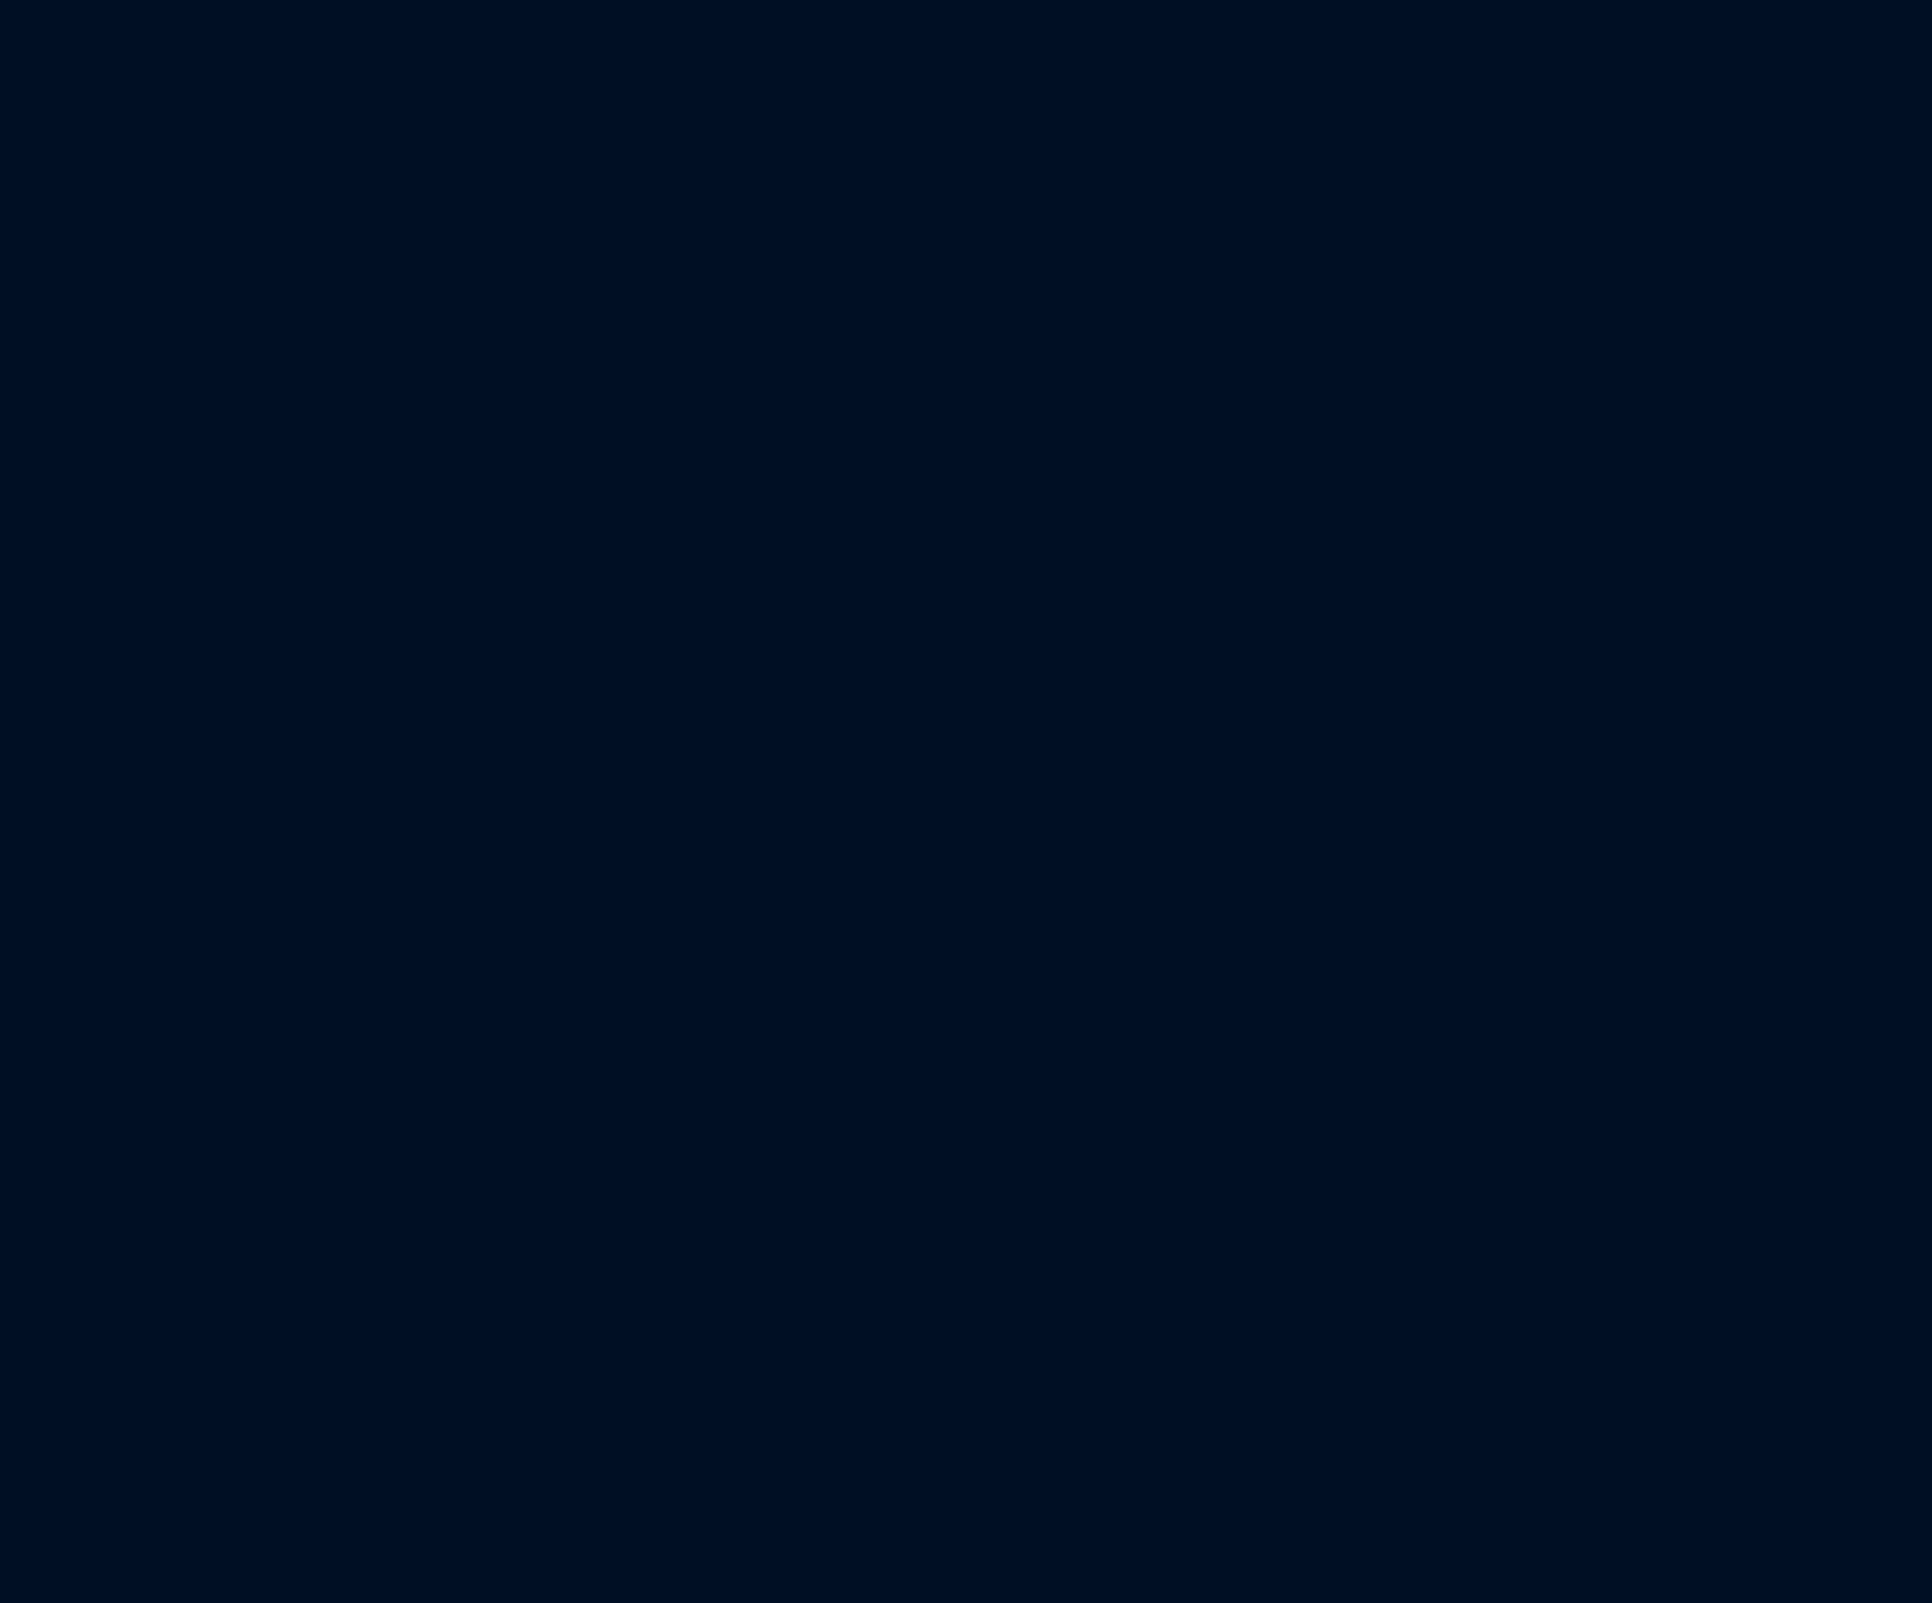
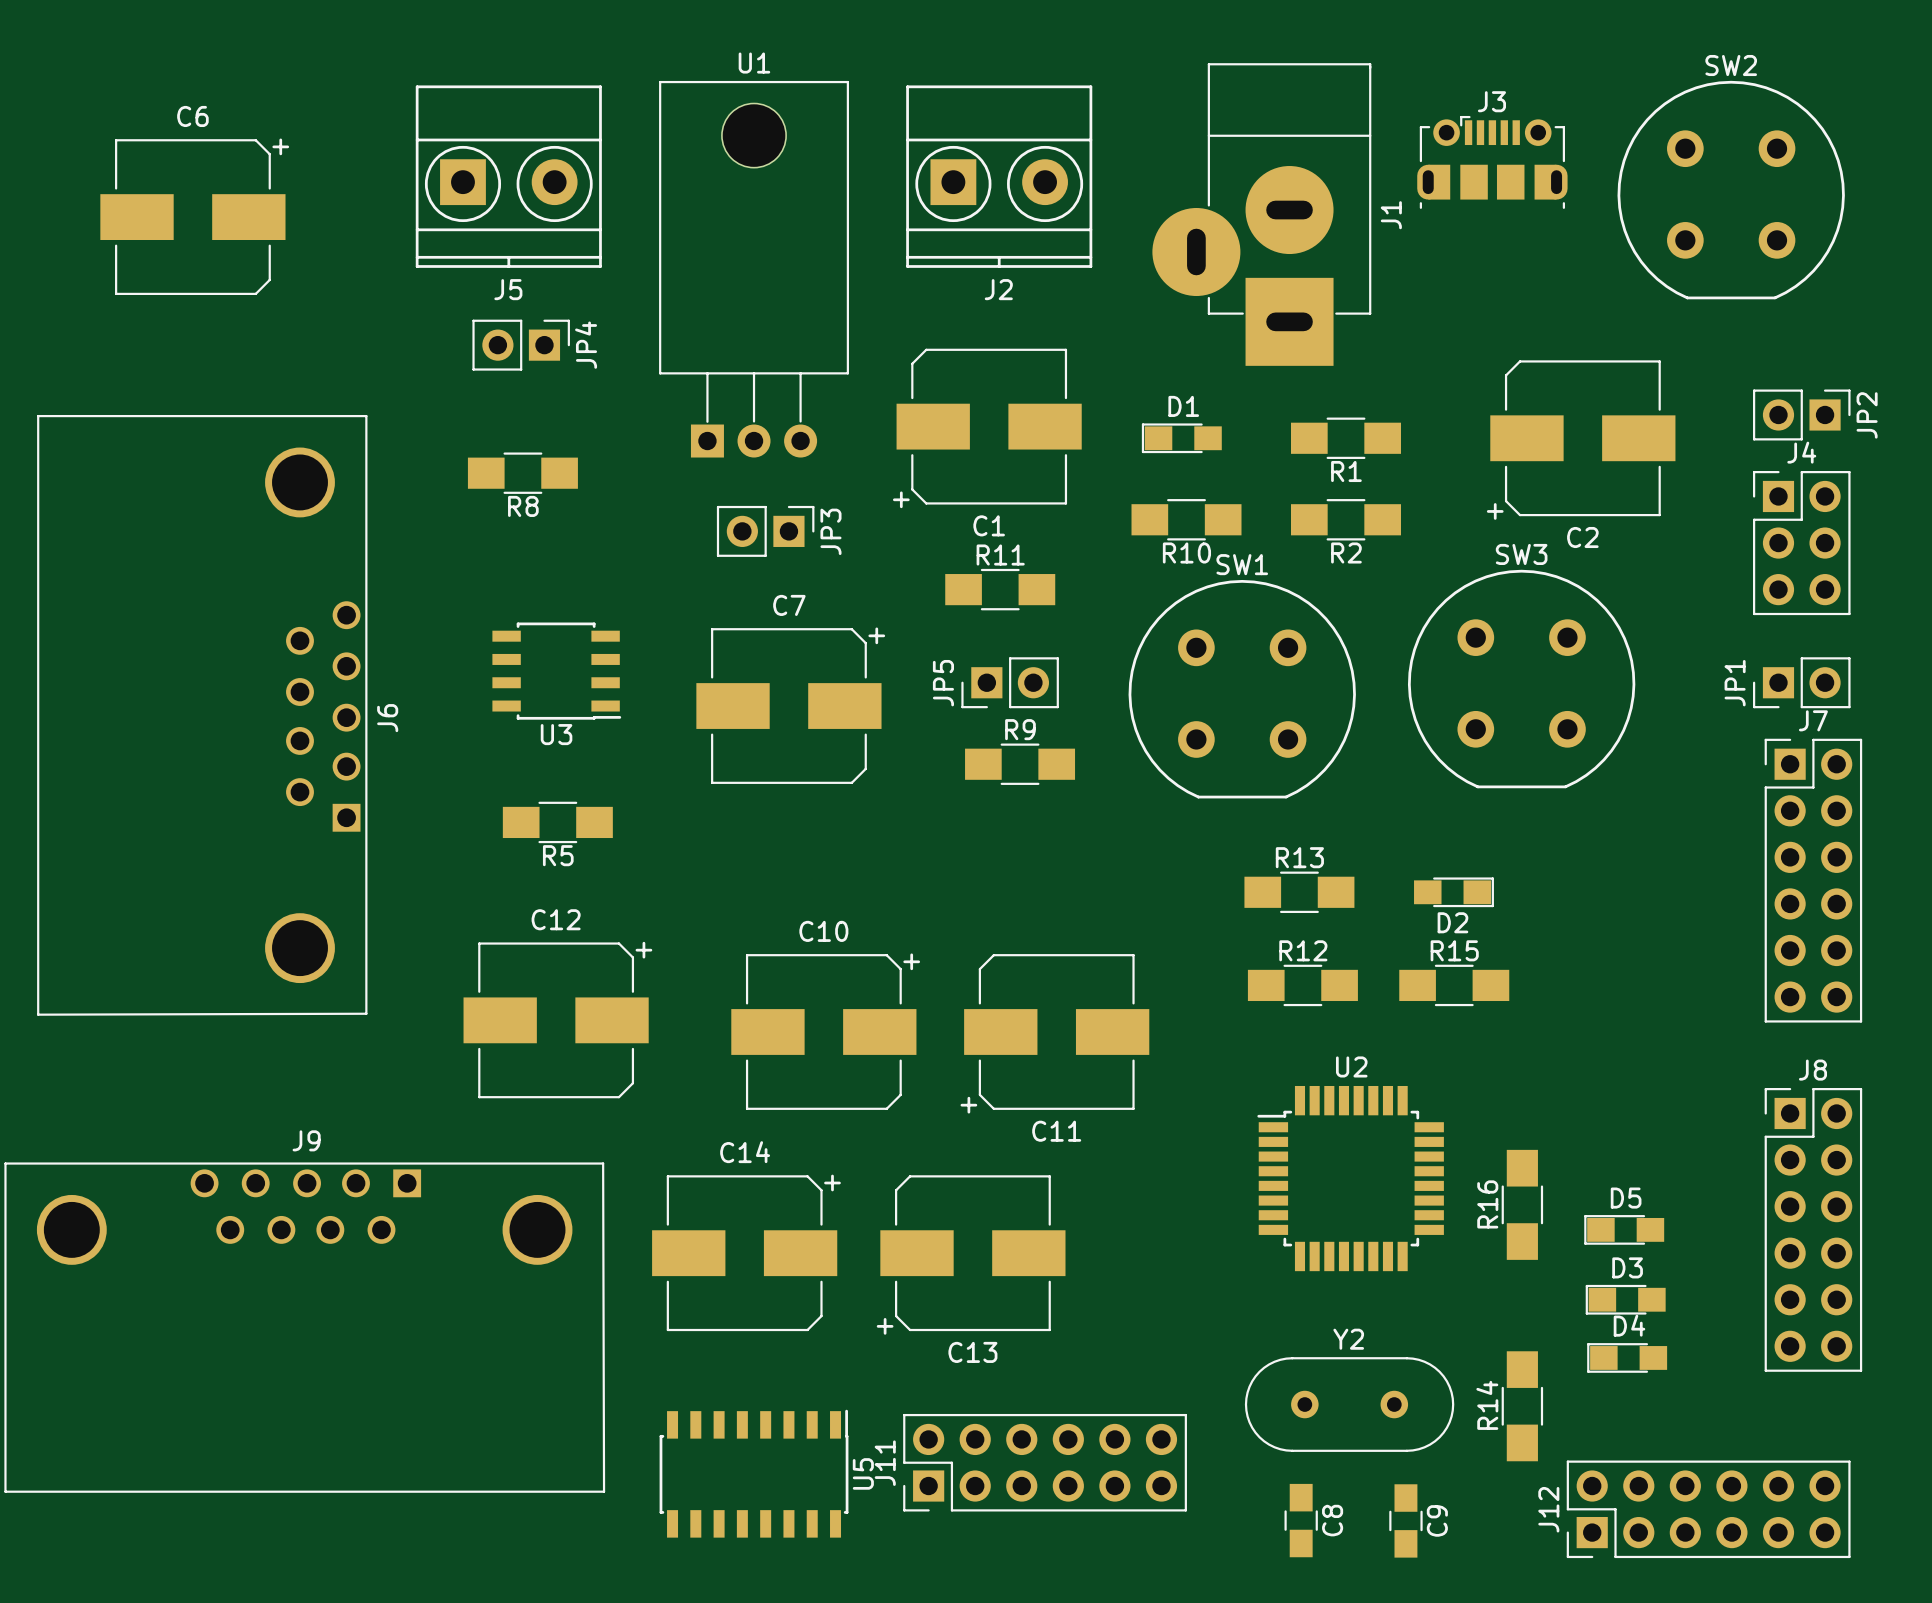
J3: none -> (1492, 162)
J5: none -> (508, 176)
J2: none -> (999, 176)
SW2: none -> (1731, 190)
J1: none -> (1261, 214)
C6: none -> (192, 217)
U1: none -> (754, 269)
JP4: none -> (521, 345)
JP2: none -> (1801, 414)
C1: none -> (989, 426)
D1: none -> (1181, 438)
R1: none -> (1346, 438)
C2: none -> (1582, 438)
R8: none -> (522, 473)
R10: none -> (1186, 519)
R2: none -> (1346, 519)
JP3: none -> (765, 531)
J4: none -> (1801, 543)
R11: none -> (1000, 589)
U3: none -> (556, 671)
SW3: none -> (1521, 679)
JP5: none -> (1010, 682)
JP1: none -> (1801, 682)
SW1: none -> (1242, 689)
C7: none -> (788, 706)
J6: none -> (202, 715)
R9: none -> (1020, 764)
R5: none -> (557, 822)
J7: none -> (1813, 880)
R13: none -> (1299, 892)
D2: none -> (1453, 892)
R12: none -> (1302, 985)
R15: none -> (1454, 985)
C12: none -> (556, 1020)
C10: none -> (823, 1031)
C11: none -> (1056, 1031)
U2: none -> (1350, 1178)
R16: none -> (1522, 1204)
D5: none -> (1624, 1229)
J8: none -> (1813, 1229)
C14: none -> (744, 1253)
C13: none -> (972, 1253)
D3: none -> (1625, 1299)
J9: none -> (304, 1327)
D4: none -> (1627, 1357)
Y2: none -> (1349, 1404)
R14: none -> (1522, 1406)
J11: none -> (1045, 1462)
U5: none -> (754, 1473)
J12: none -> (1708, 1509)
C8: none -> (1301, 1520)
C9: none -> (1405, 1520)

